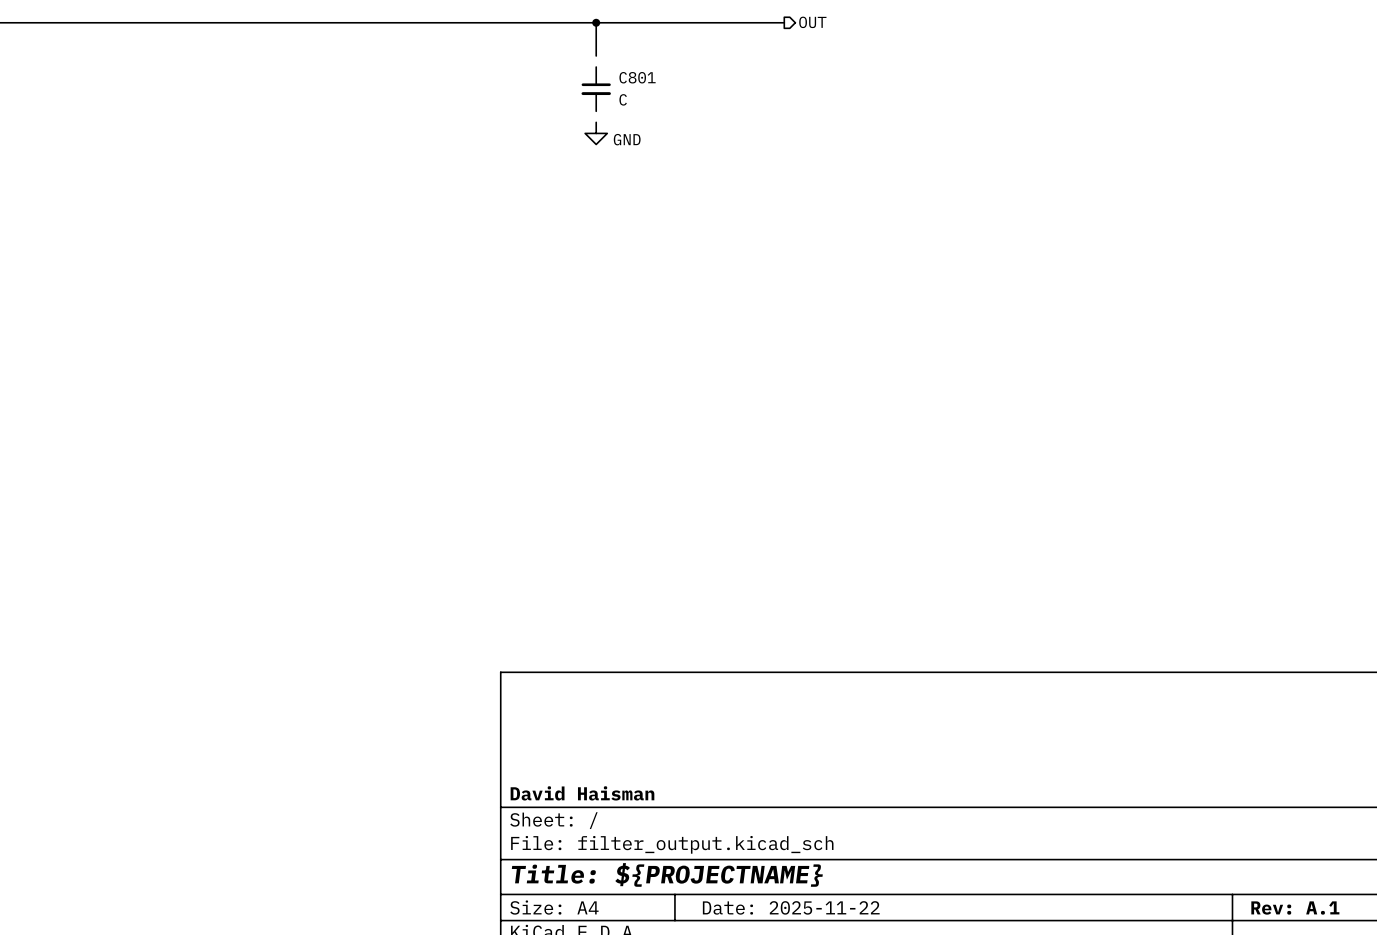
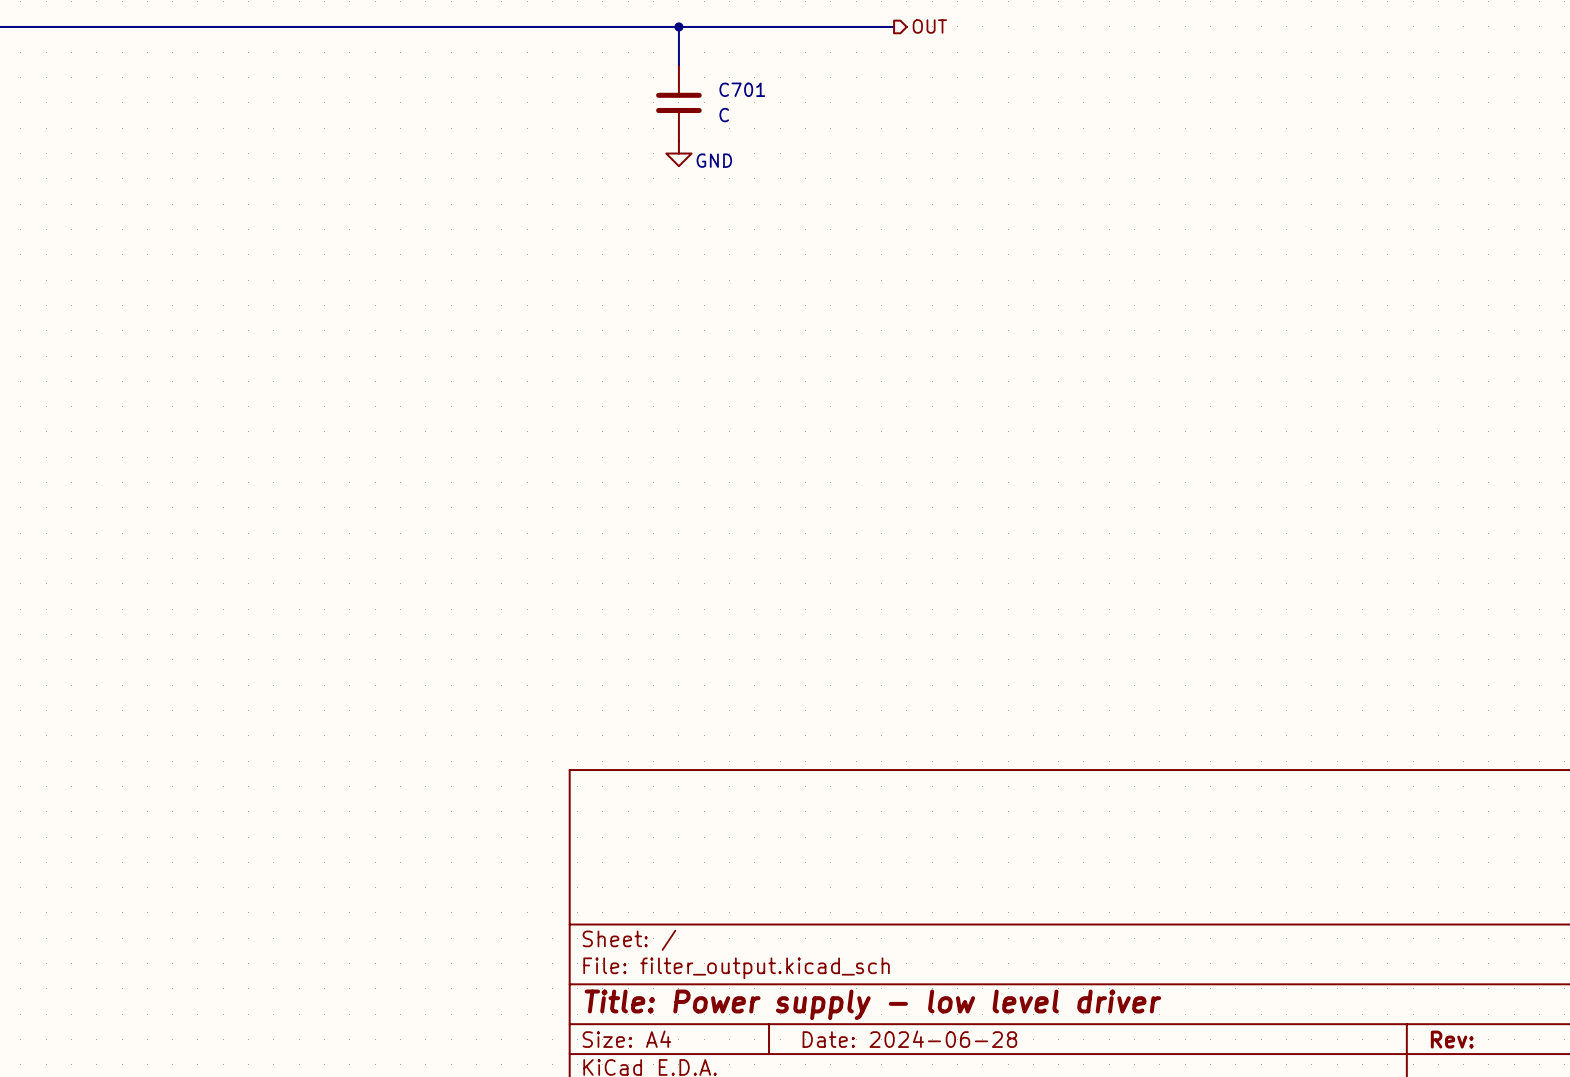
C801: C (596, 89) -> none
C701: none -> C (678, 102)
title block: David Haisman (582, 793) -> none
title block: Title: ${PROJECTNAME} (667, 874) -> Title: Power supply - low level driver (872, 1004)
title block: Date: 2025-11-22 (791, 907) -> Date: 2024-06-28 (909, 1039)
title block: Rev: A.1 (1295, 908) -> Rev: (1452, 1039)

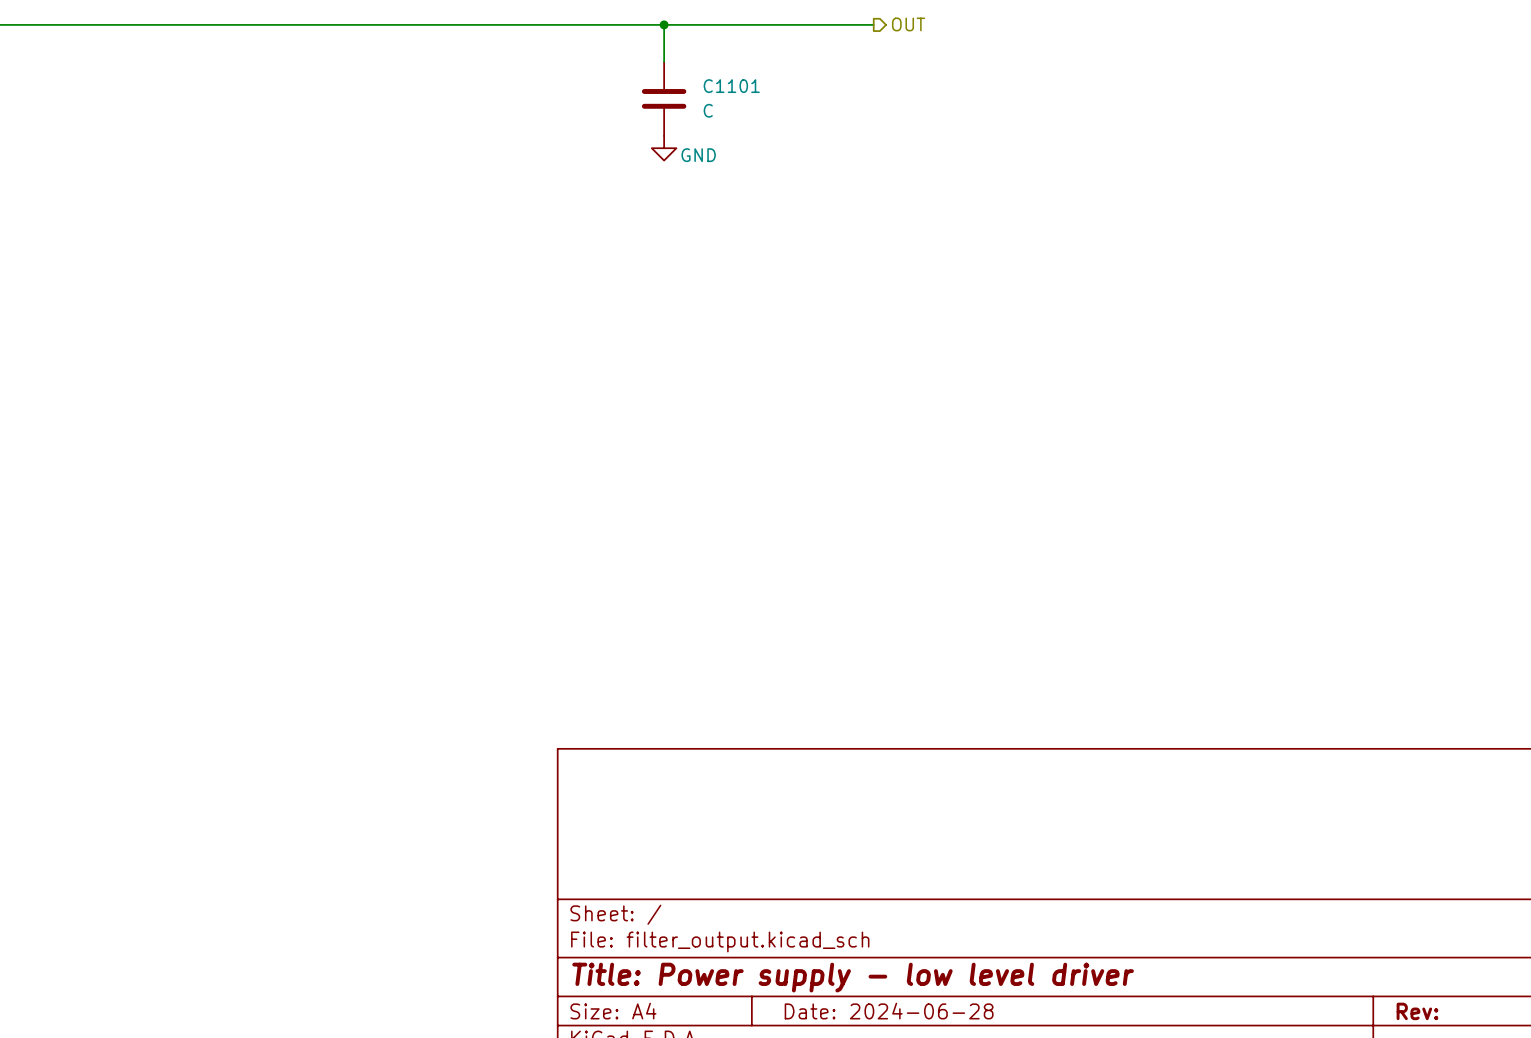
C701 name: C701 (742, 89) -> C1101 (731, 86)

